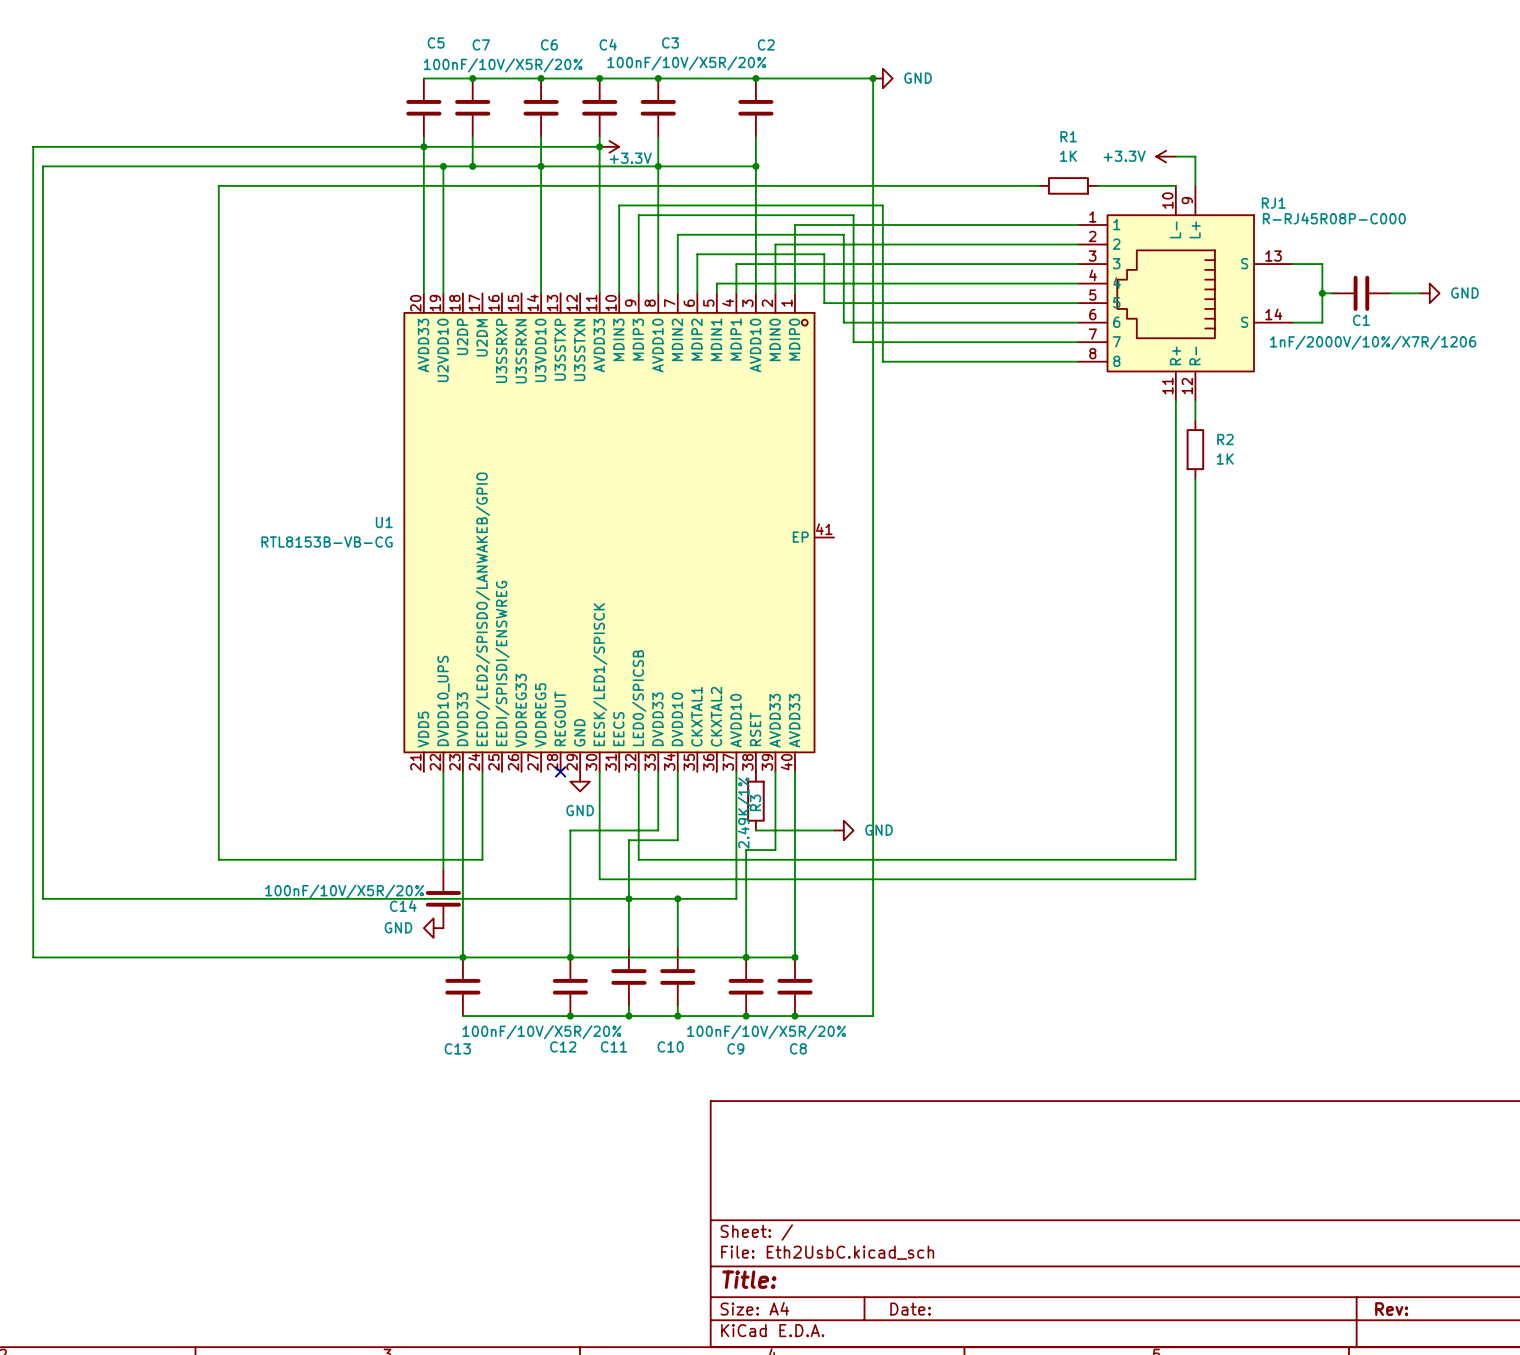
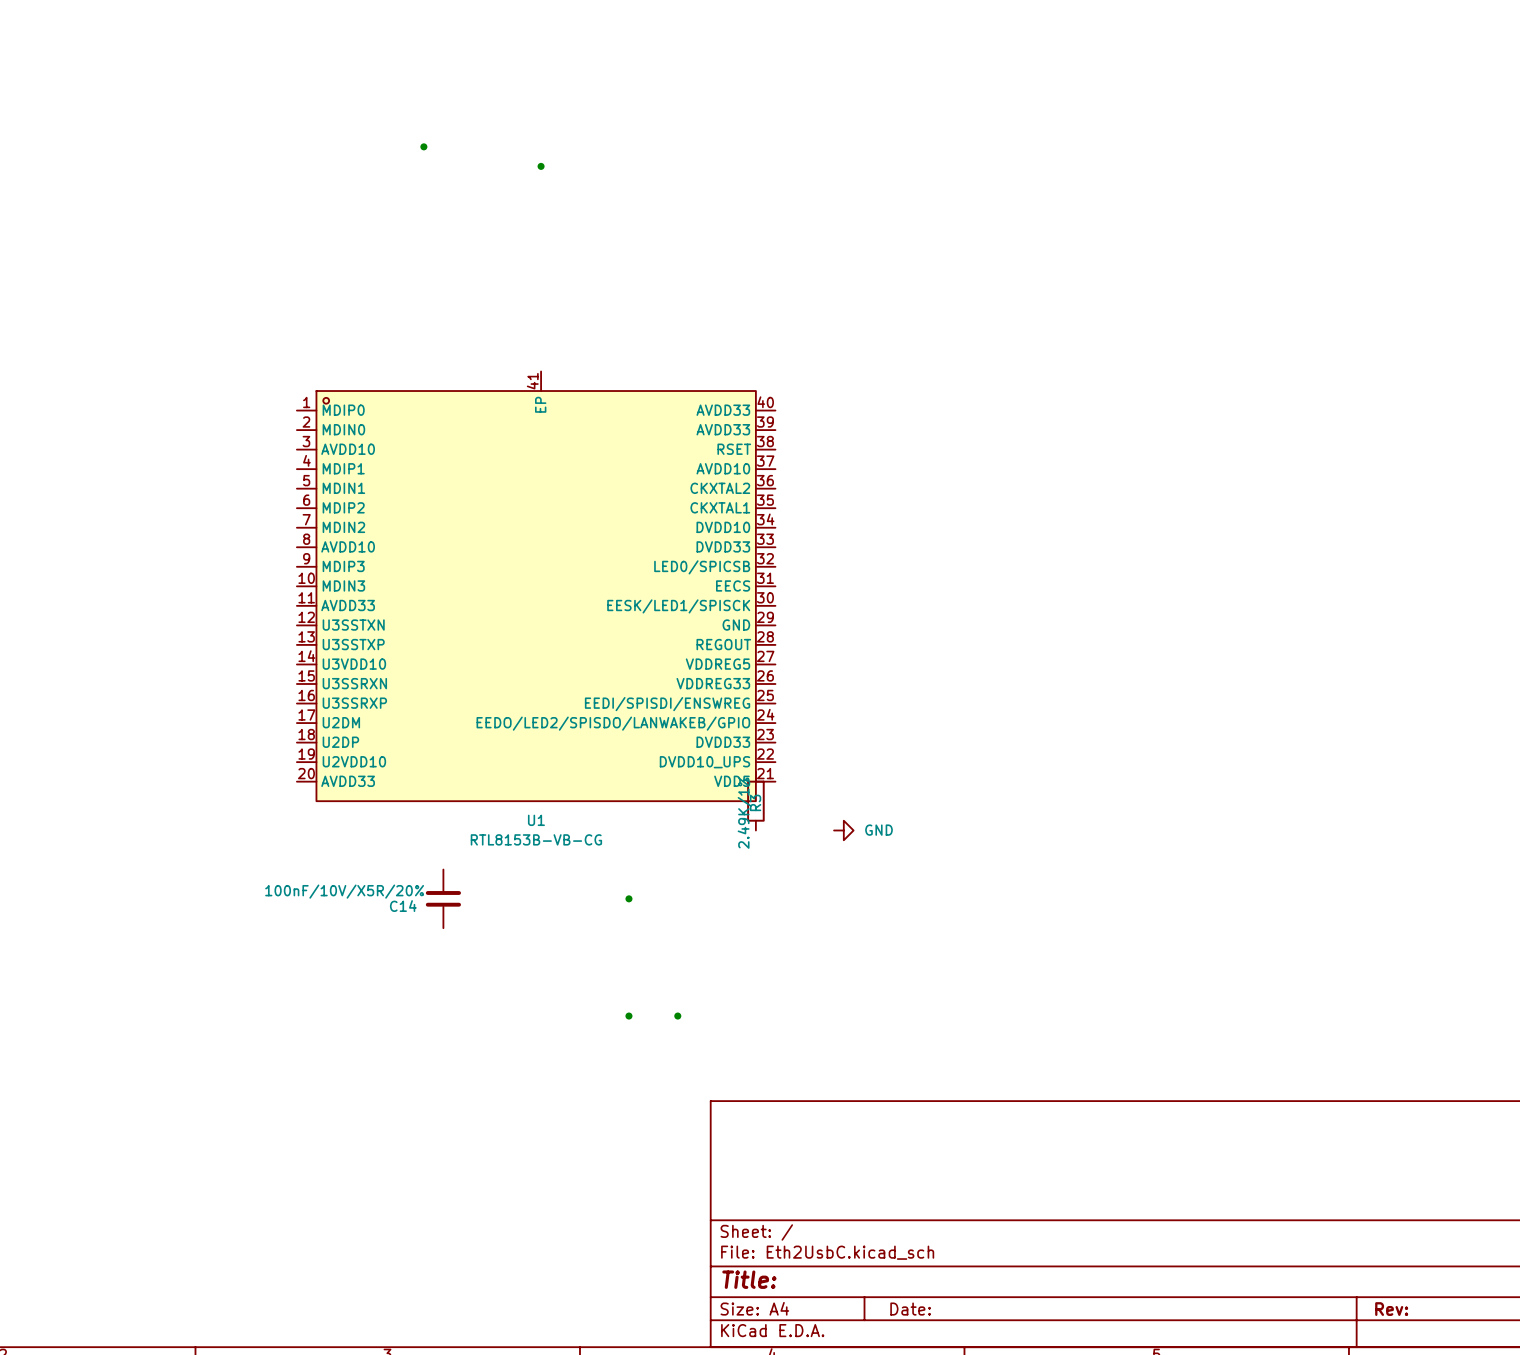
wire: (423, 78) (873, 78) (873, 1016) (462, 1016) -> none
junction: (472, 78) -> none
junction: (541, 78) -> none
junction: (599, 78) -> none
junction: (658, 78) -> none
junction: (755, 78) -> none
junction: (873, 78) -> none
power symbol: GND (882, 78) -> none
C5: 100nF/10V/X5R/20% (423, 107) -> none
C7: (472, 107) -> none
C6: (541, 107) -> none
C4: (599, 107) -> none
C3: 100nF/10V/X5R/20% (658, 107) -> none
C2: (755, 107) -> none
wire: (423, 137) (423, 293) -> none
wire: (472, 137) (472, 166) -> none
wire: (541, 137) (541, 293) -> none
wire: (599, 137) (599, 293) -> none
wire: (658, 137) (658, 293) -> none
wire: (755, 137) (755, 293) -> none
wire: (599, 146) (33, 146) (33, 957) (794, 957) (794, 771) -> none
junction: (599, 146) -> none
power symbol: +3.3V (609, 146) -> none
power symbol: +3.3V (1166, 156) -> none
wire: (1175, 156) (1195, 156) (1195, 185) -> none
wire: (443, 166) (443, 293) -> none
junction: (443, 166) -> none
junction: (472, 166) -> none
junction: (658, 166) -> none
wire: (755, 166) (42, 166) (42, 898) (736, 898) (736, 771) -> none
junction: (755, 166) -> none
wire: (1039, 185) (218, 185) (218, 859) (482, 859) (482, 771) -> none
R1: 1K (1068, 185) -> none
wire: (1097, 185) (1175, 185) -> none
wire: (1078, 224) (794, 224) (794, 293) -> none
wire: (1078, 244) (775, 244) (775, 293) -> none
wire: (1078, 264) (736, 264) (736, 293) -> none
wire: (1293, 264) (1322, 264) (1322, 322) (1293, 322) -> none
wire: (1078, 283) (716, 283) (716, 293) -> none
wire: (619, 293) (619, 205) (882, 205) (882, 361) (1078, 361) -> none
wire: (638, 293) (638, 215) (853, 215) (853, 342) (1078, 342) -> none
wire: (677, 293) (677, 234) (843, 234) (843, 322) (1078, 322) -> none
wire: (697, 293) (697, 254) (824, 254) (824, 303) (1078, 303) -> none
RJ1: R-RJ45R08P-C000 (1185, 293) -> none
wire: (1322, 293) (1332, 293) -> none
junction: (1322, 293) -> none
C1: 1nF/2000V/10%/X7R/1206 (1361, 293) -> none
wire: (1390, 293) (1420, 293) -> none
power symbol: GND (1429, 293) -> none
wire: (1175, 400) (1175, 859) (638, 859) (638, 771) -> none
wire: (1195, 400) (1195, 420) -> none
R2: 1K (1195, 449) -> none
wire: (1195, 478) (1195, 879) (599, 879) (599, 771) -> none
U1 rotation: 0° (609, 532) -> 90° counterclockwise (536, 596)
U1 value position: RTL8153B-VB-CG (327, 542) -> RTL8153B-VB-CG (536, 839)
wire: (443, 771) (443, 869) -> none
wire: (462, 771) (462, 957) -> none
no-connect mark: (560, 771) -> none
wire: (658, 771) (658, 830) (570, 830) (570, 957) -> none
wire: (677, 771) (677, 840) (628, 840) (628, 947) -> none
wire: (775, 771) (775, 850) (746, 850) (746, 957) -> none
power symbol: GND (580, 781) -> none
wire: (755, 830) (834, 830) -> none
wire: (677, 898) (677, 947) -> none
junction: (677, 898) -> none
power symbol: GND (433, 928) -> none
junction: (462, 957) -> none
junction: (570, 957) -> none
junction: (746, 957) -> none
junction: (794, 957) -> none
C11: (628, 976) -> none
C10: (677, 976) -> none
C13: (462, 986) -> none
C12: 100nF/10V/X5R/20% (570, 986) -> none
C9: (746, 986) -> none
C8: 100nF/10V/X5R/20% (794, 986) -> none
wire: (628, 1006) (628, 1016) -> none
wire: (677, 1006) (677, 1016) -> none
junction: (570, 1016) -> none
junction: (746, 1016) -> none
junction: (794, 1016) -> none

